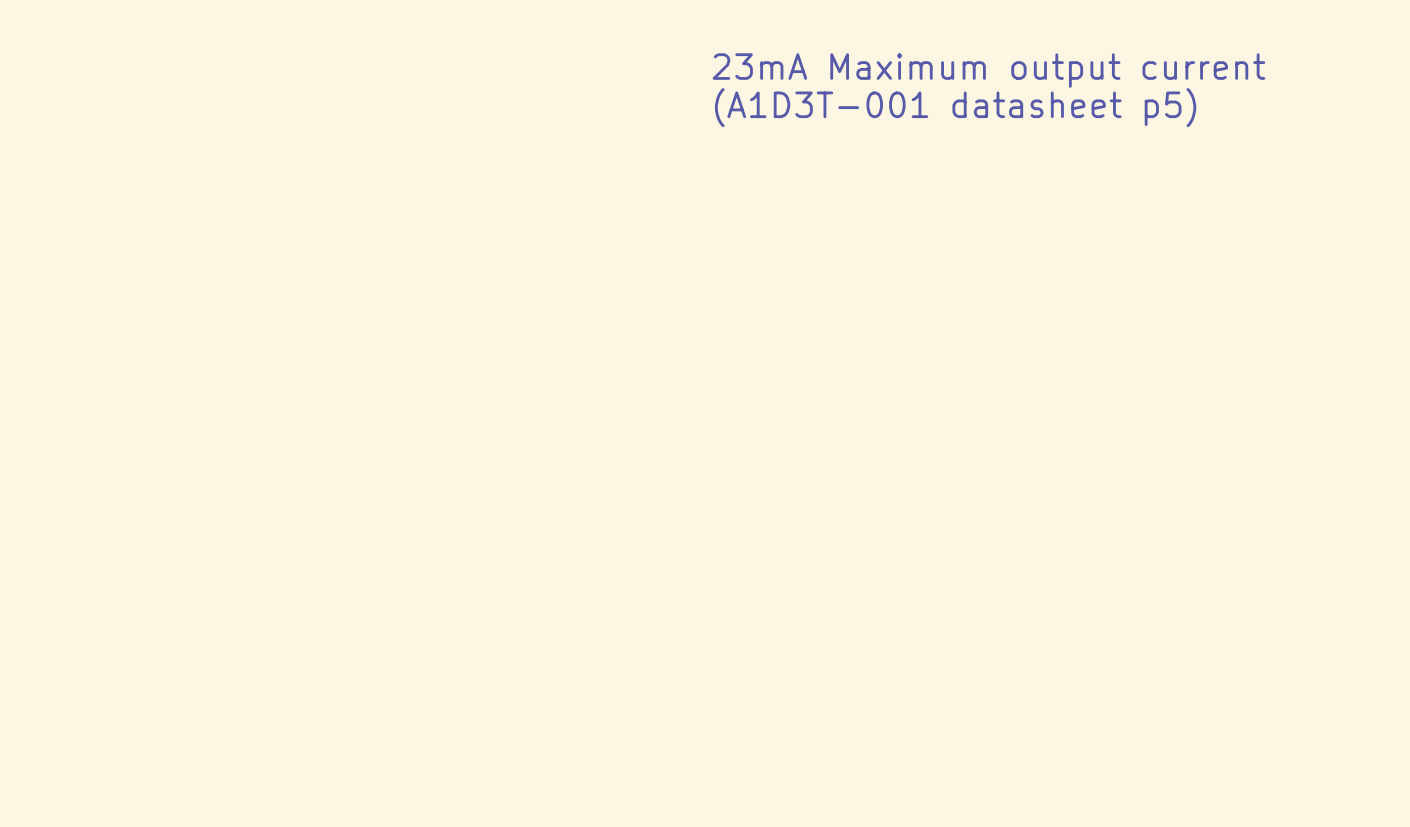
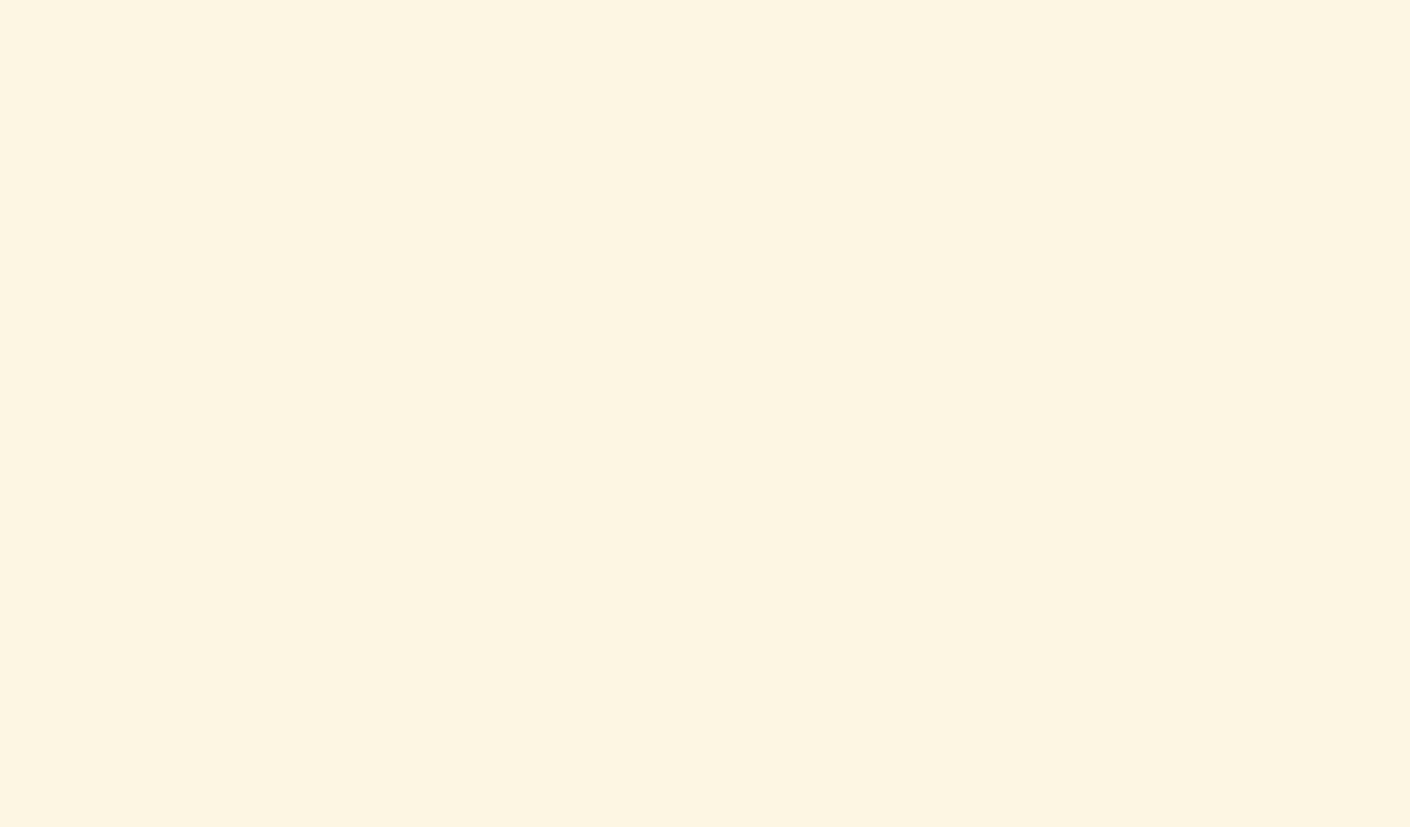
text: 23mA Maximum output current (988, 70) -> none
text: (A1D3T-001 datasheet p5) (955, 107) -> none

